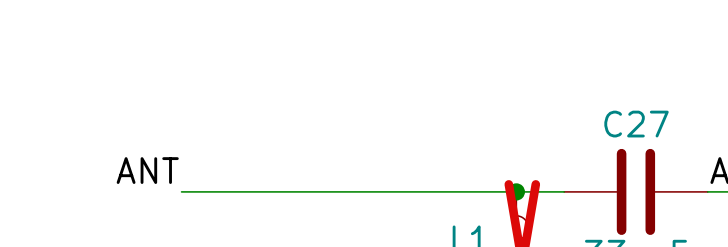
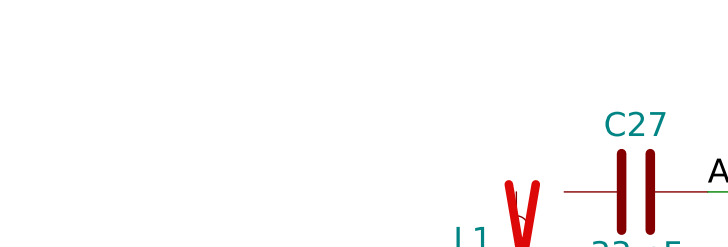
label: ANT (147, 170) -> none
wire: (181, 191) (564, 191) -> none
junction: (516, 191) -> none

